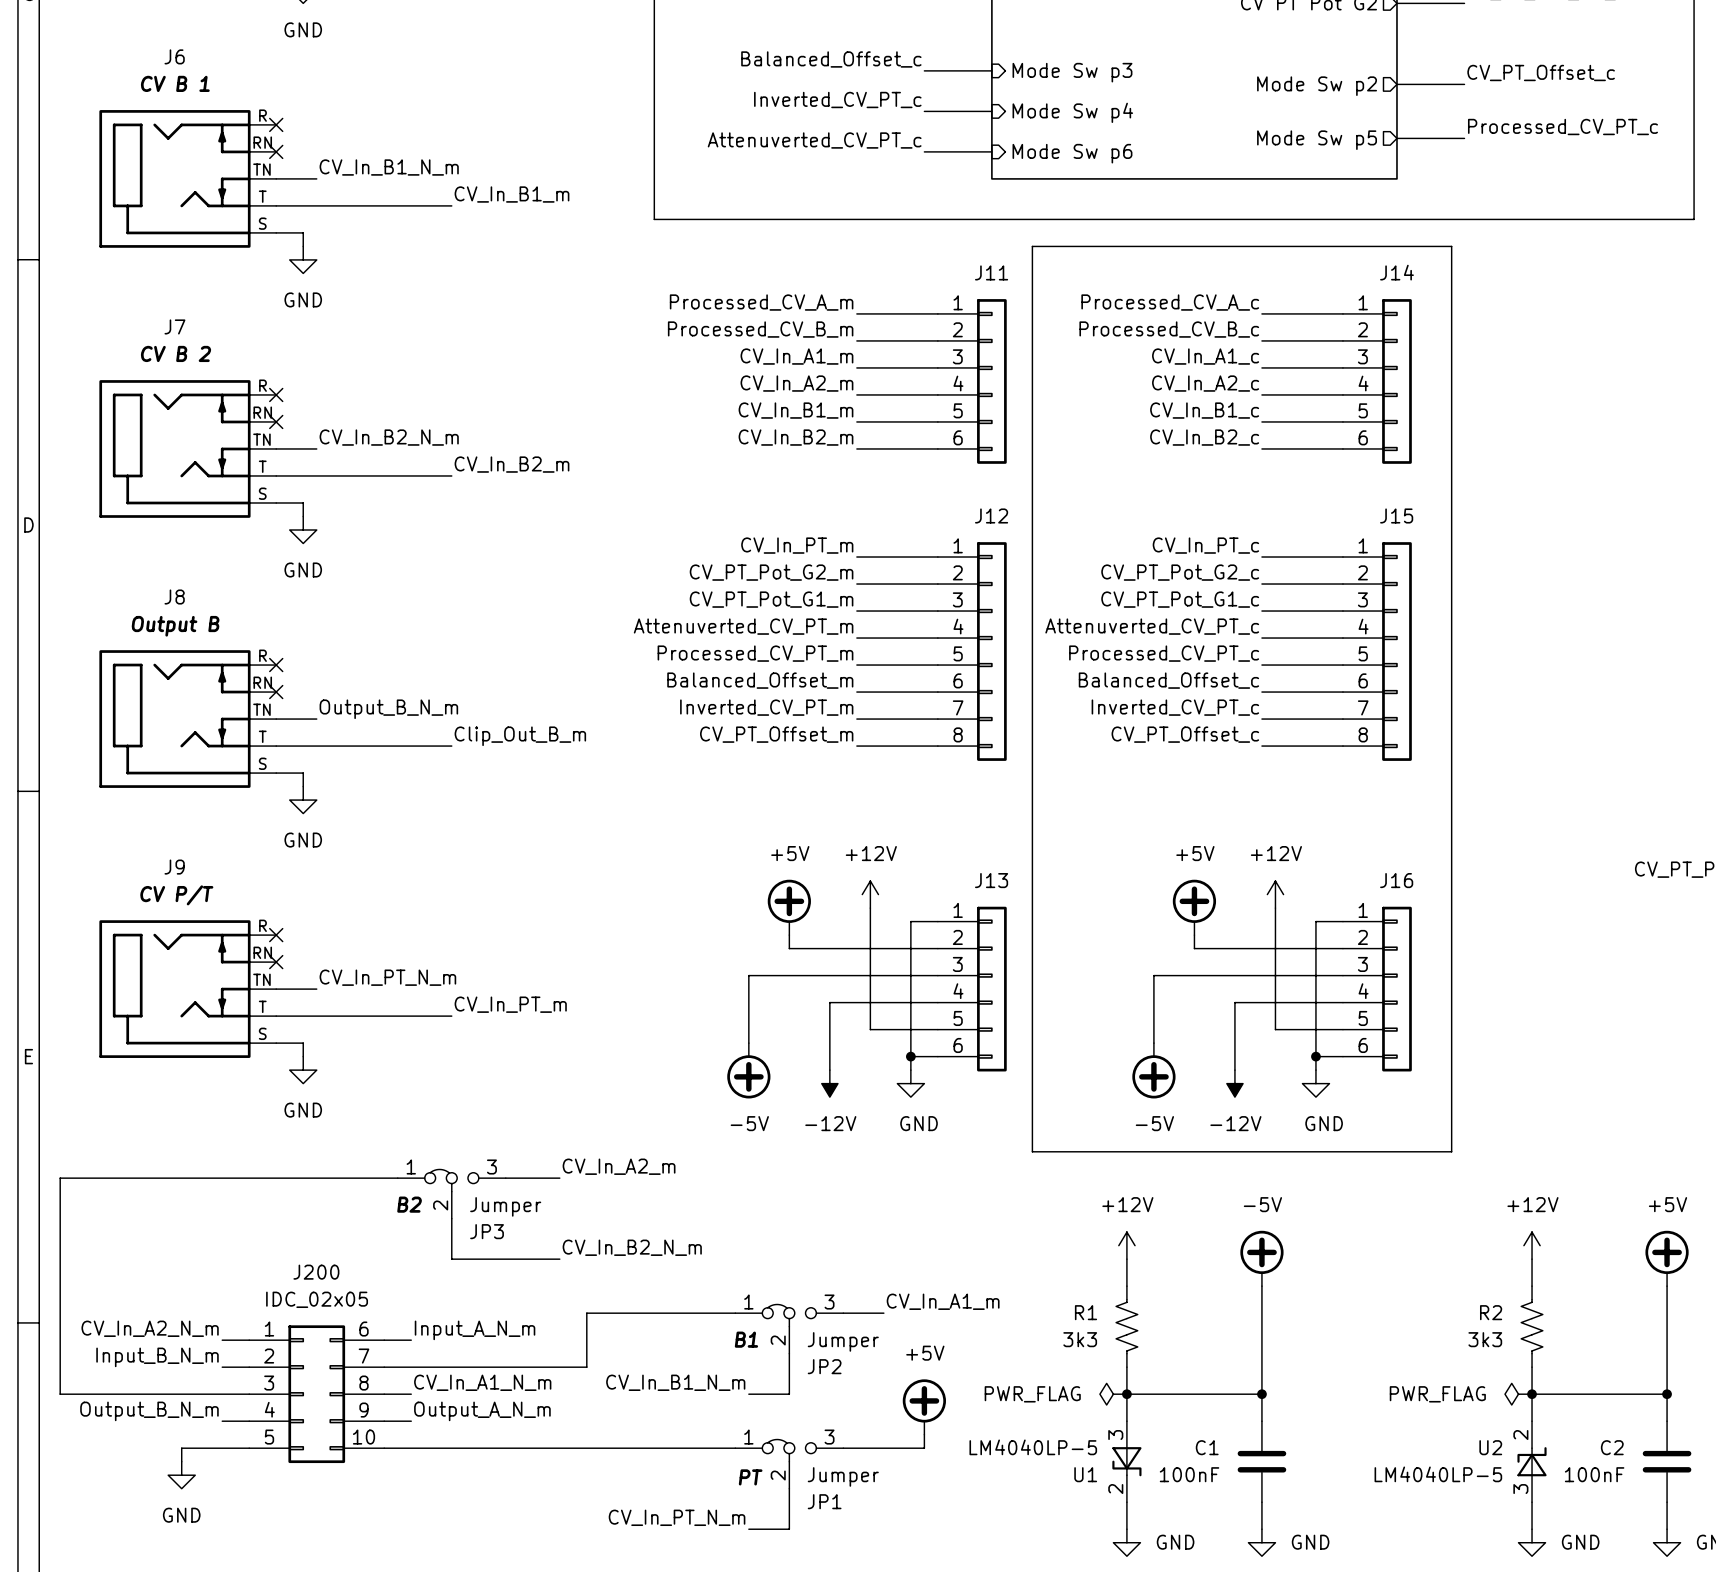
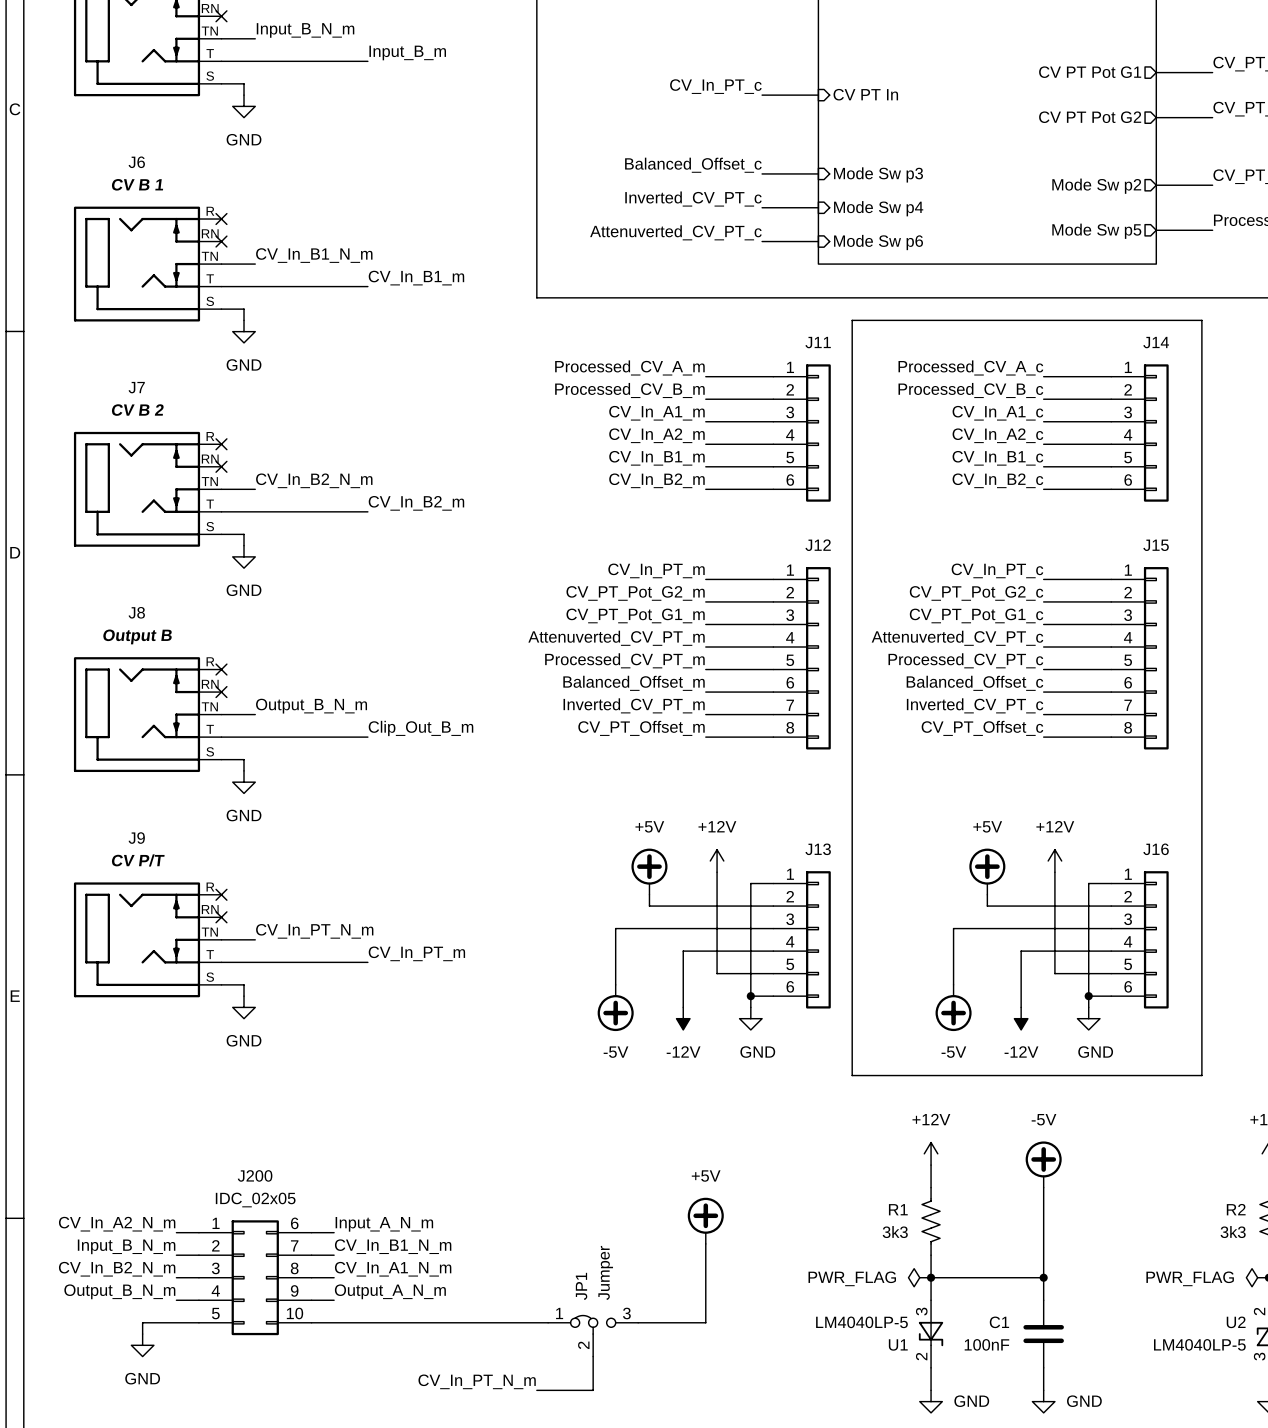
label: CV_In_A2_m (619, 1166) -> none
wire: (397, 1178) (60, 1178) (60, 1394) (222, 1394) -> none
wire: (505, 1178) (559, 1178) -> none
JP3: Jumper (451, 1194) -> none
wire: (451, 1218) (451, 1259) (559, 1259) -> none
label: CV_In_B2_N_m (632, 1247) -> none
label: CV_In_A1_m (943, 1301) -> none
wire: (735, 1313) (586, 1313) (586, 1367) (411, 1367) -> none
wire: (843, 1313) (883, 1313) -> none
JP2: Jumper (789, 1329) -> none
wire: (789, 1353) (789, 1394) (748, 1394) -> none
label: none -> CV_In_B1_N_m (393, 1246)
label: none -> CV_In_B2_N_m (117, 1269)
label: CV_In_B1_N_m (675, 1382) -> none
power symbol position: +5V (924, 1407) -> +5V (705, 1220)
wire: (924, 1434) (924, 1448) (856, 1448) -> (705, 1243) (705, 1322)
wire: (667, 1448) (735, 1448) -> (638, 1322) (694, 1322)
JP1 position: (789, 1464) -> (593, 1336)
JP1 value rotation: 0° (843, 1476) -> 90° counterclockwise (605, 1272)
JP1 value position: Jumper (843, 1476) -> Jumper (605, 1272)
JP1 text: PT (750, 1477) -> none
wire: none -> (593, 1356) (593, 1390) (536, 1390)
wire: (789, 1488) (789, 1529) (748, 1529) -> none
JP1 name rotation: 0° (824, 1501) -> 90° counterclockwise (581, 1286)
JP1 name position: JP1 (824, 1501) -> JP1 (581, 1286)
label position: CV_In_PT_N_m (677, 1517) -> CV_In_PT_N_m (477, 1381)

